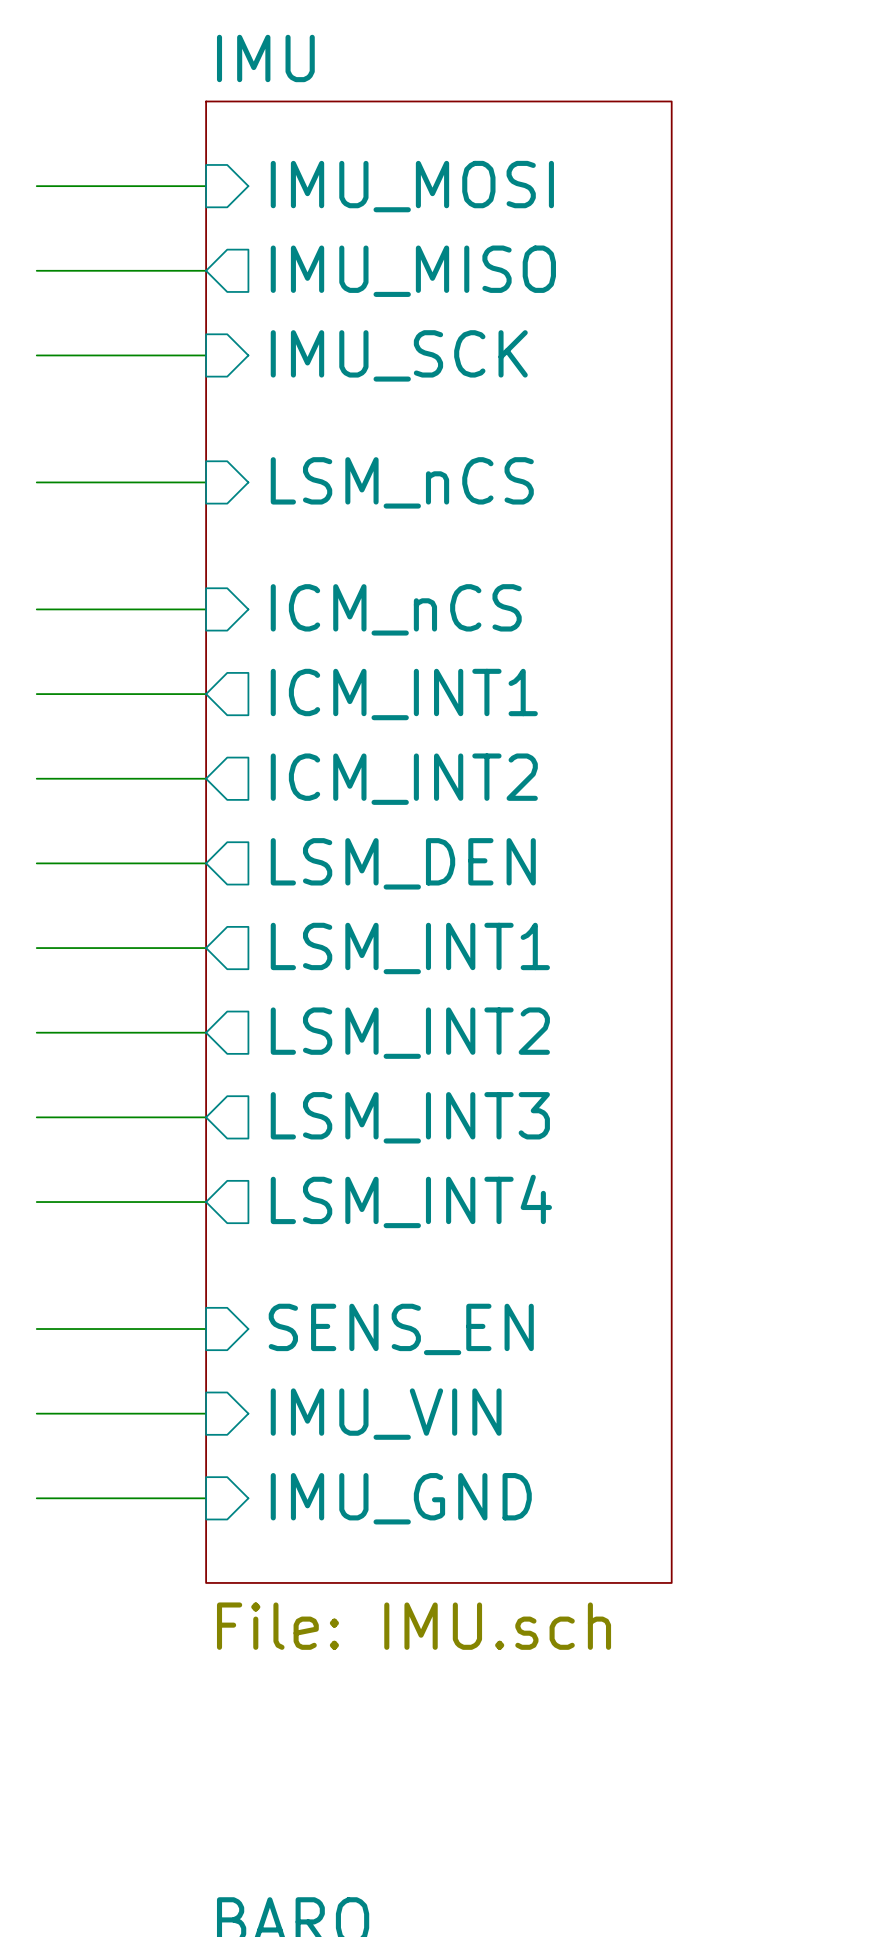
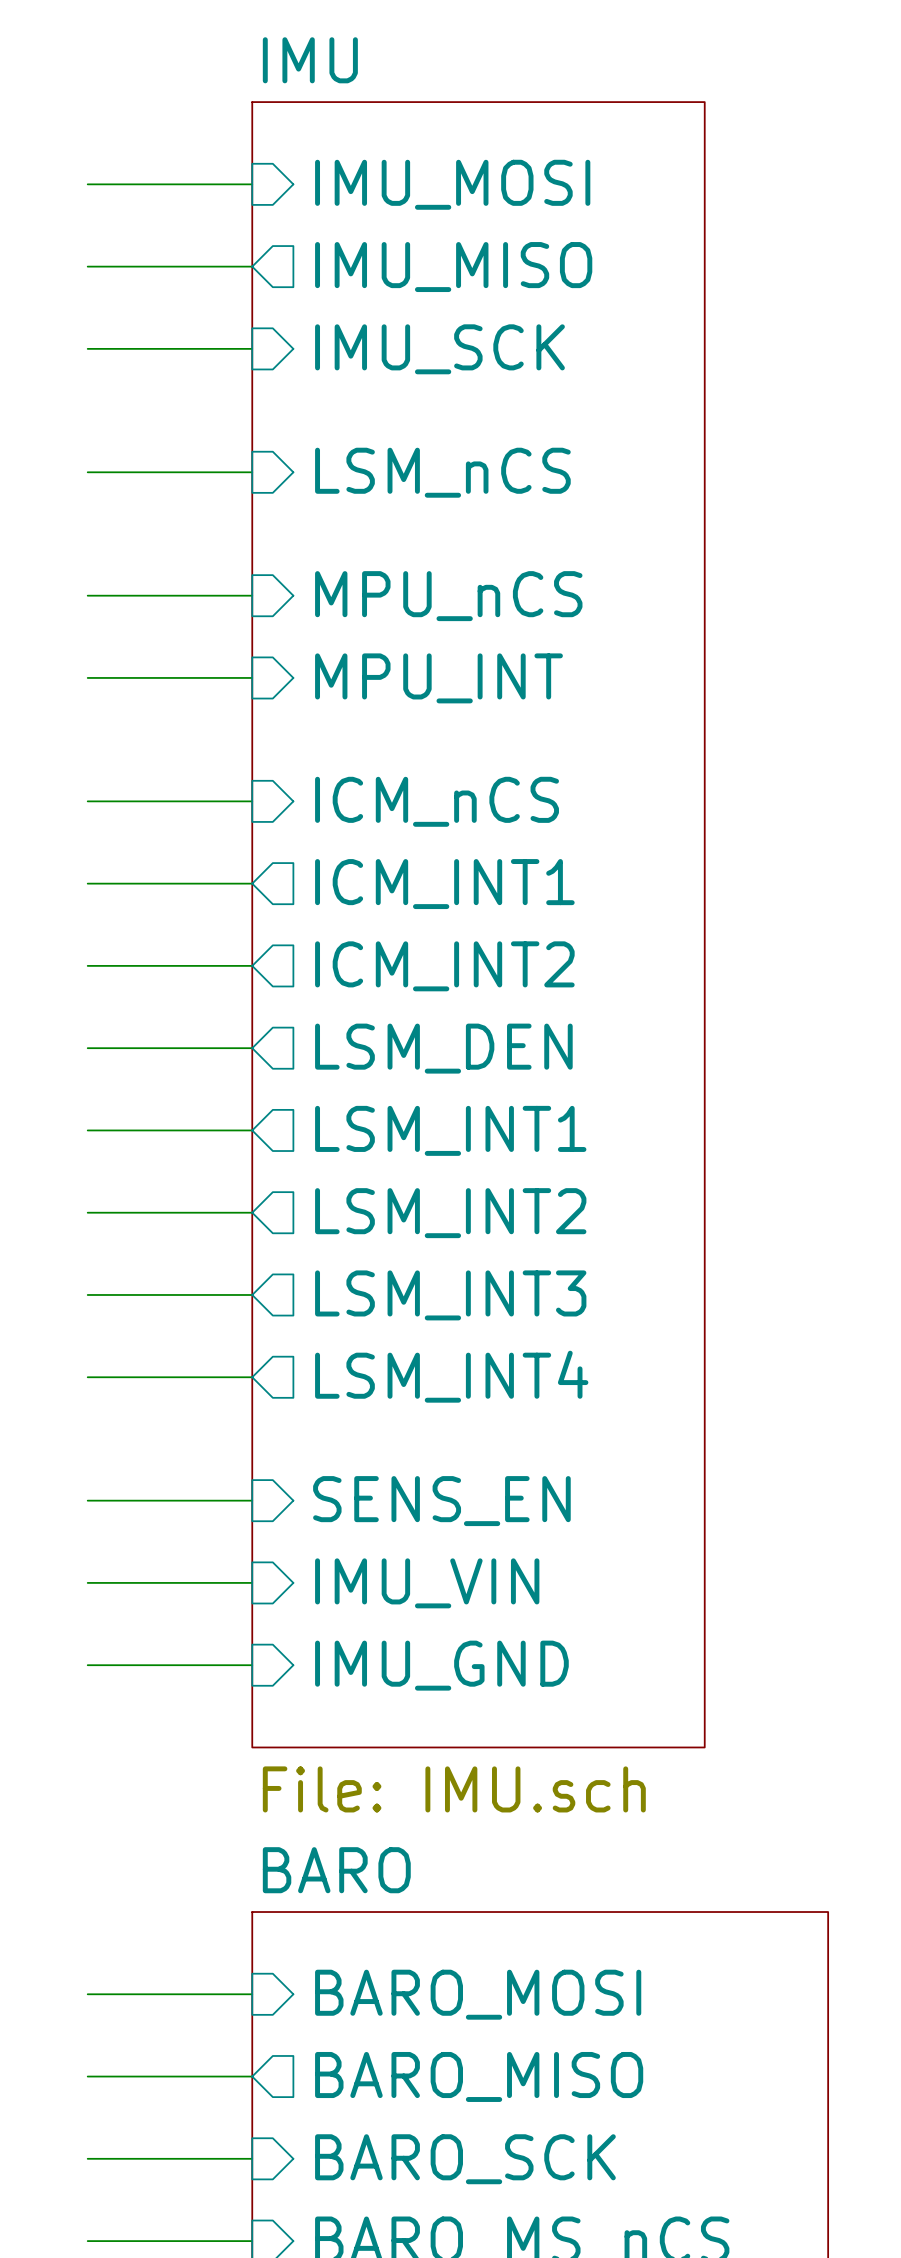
sheet pin: ICM_nCS (396, 609) -> MPU_nCS (448, 596)
sheet pin shape: output (404, 694) -> input (438, 678)
sheet pin: ICM_INT1 (404, 694) -> MPU_INT (438, 678)
wire: (36, 778) (206, 778) -> (87, 801) (252, 801)
sheet pin position: ICM_INT2 (404, 779) -> ICM_INT2 (444, 966)
sheet pin: none -> ICM_nCS (437, 801)
sheet IMU: File: IMU.sch (438, 842) -> none
wire: (36, 863) (206, 863) -> (87, 883) (252, 883)
sheet pin position: LSM_DEN (403, 863) -> LSM_DEN (443, 1048)
sheet pin: none -> ICM_INT1 (444, 884)
wire: (36, 948) (206, 948) -> (87, 965) (252, 965)
sheet pin position: LSM_INT1 (410, 948) -> LSM_INT1 (450, 1130)
sheet IMU: none -> File: IMU.sch (478, 924)
wire: (36, 1032) (206, 1032) -> (87, 1048) (252, 1048)
sheet pin position: LSM_INT2 (410, 1033) -> LSM_INT2 (450, 1213)
wire: (36, 1117) (206, 1117) -> (87, 1130) (252, 1130)
sheet pin: LSM_INT3 (410, 1117) -> none
sheet pin: LSM_INT4 (411, 1201) -> none
wire: (36, 1202) (206, 1202) -> (87, 1212) (252, 1212)
sheet pin shape: input (401, 1329) -> output (450, 1295)
sheet pin: SENS_EN (401, 1329) -> LSM_INT3 (450, 1295)
sheet pin shape: input (386, 1414) -> output (451, 1376)
sheet pin: IMU_VIN (386, 1414) -> LSM_INT4 (451, 1376)
wire: (36, 1498) (206, 1498) -> (87, 1500) (252, 1500)
sheet pin position: IMU_GND (401, 1498) -> IMU_GND (441, 1665)
sheet pin: none -> SENS_EN (441, 1501)
wire: none -> (87, 1582) (252, 1582)
sheet pin: none -> IMU_VIN (427, 1583)
wire: none -> (87, 1665) (252, 1665)

